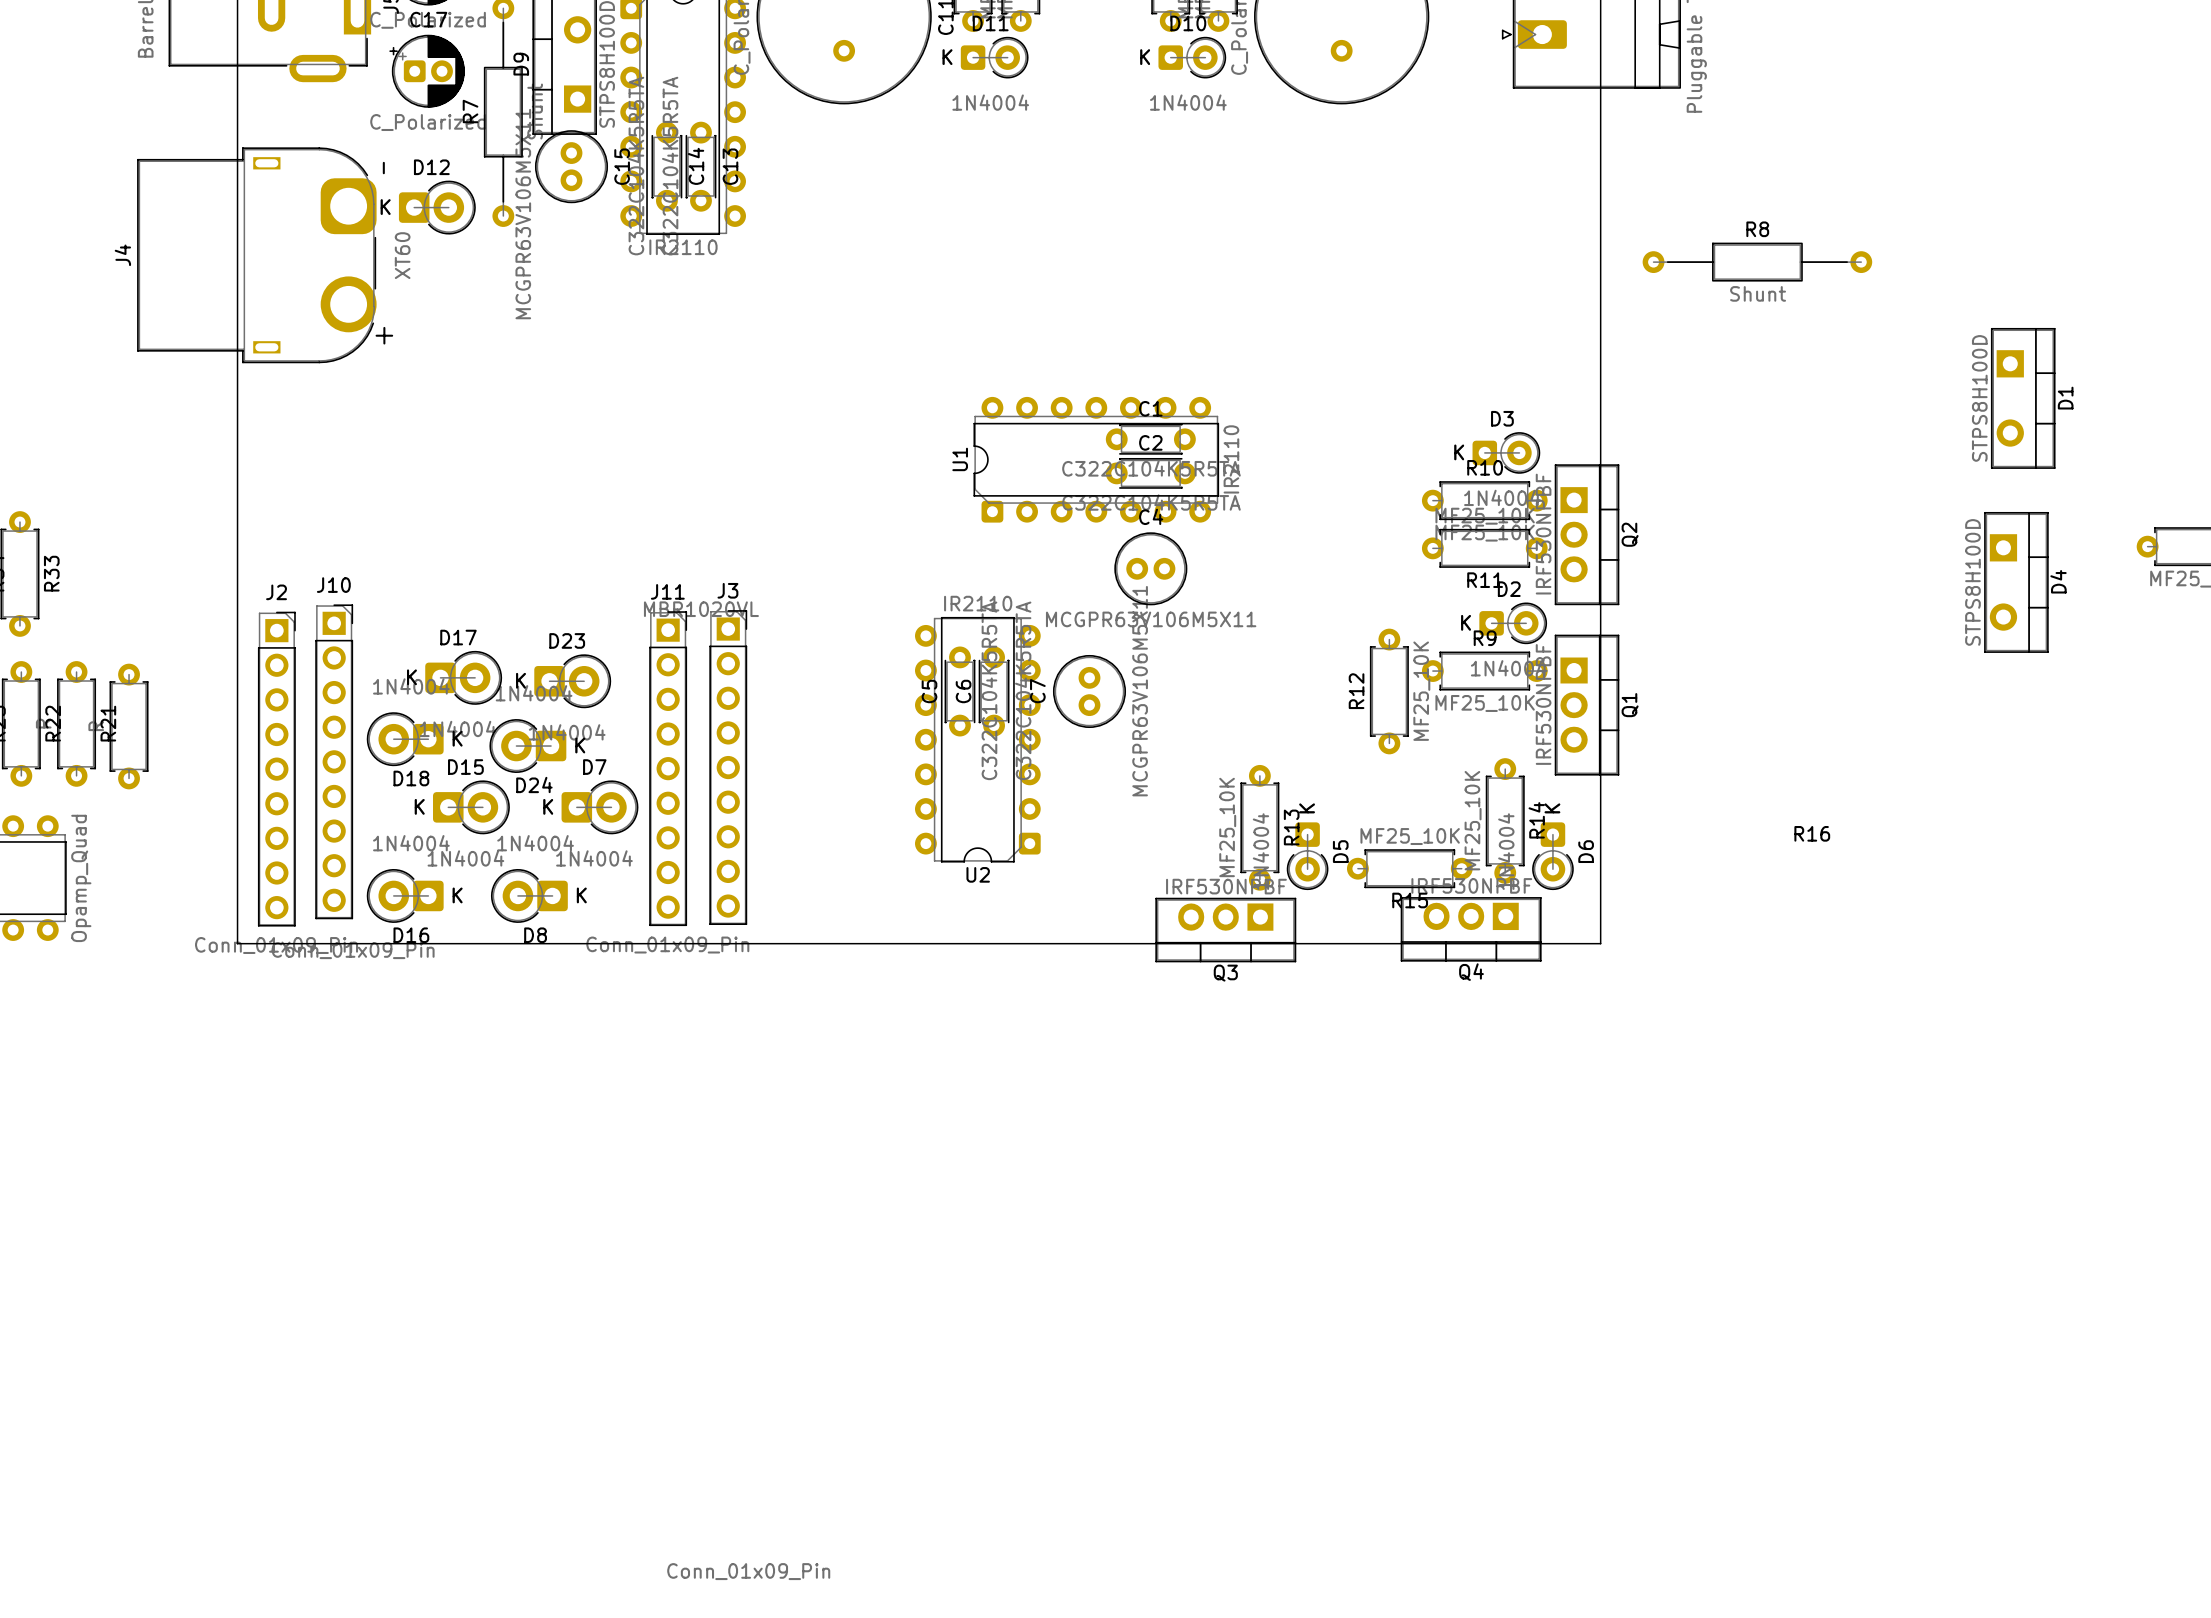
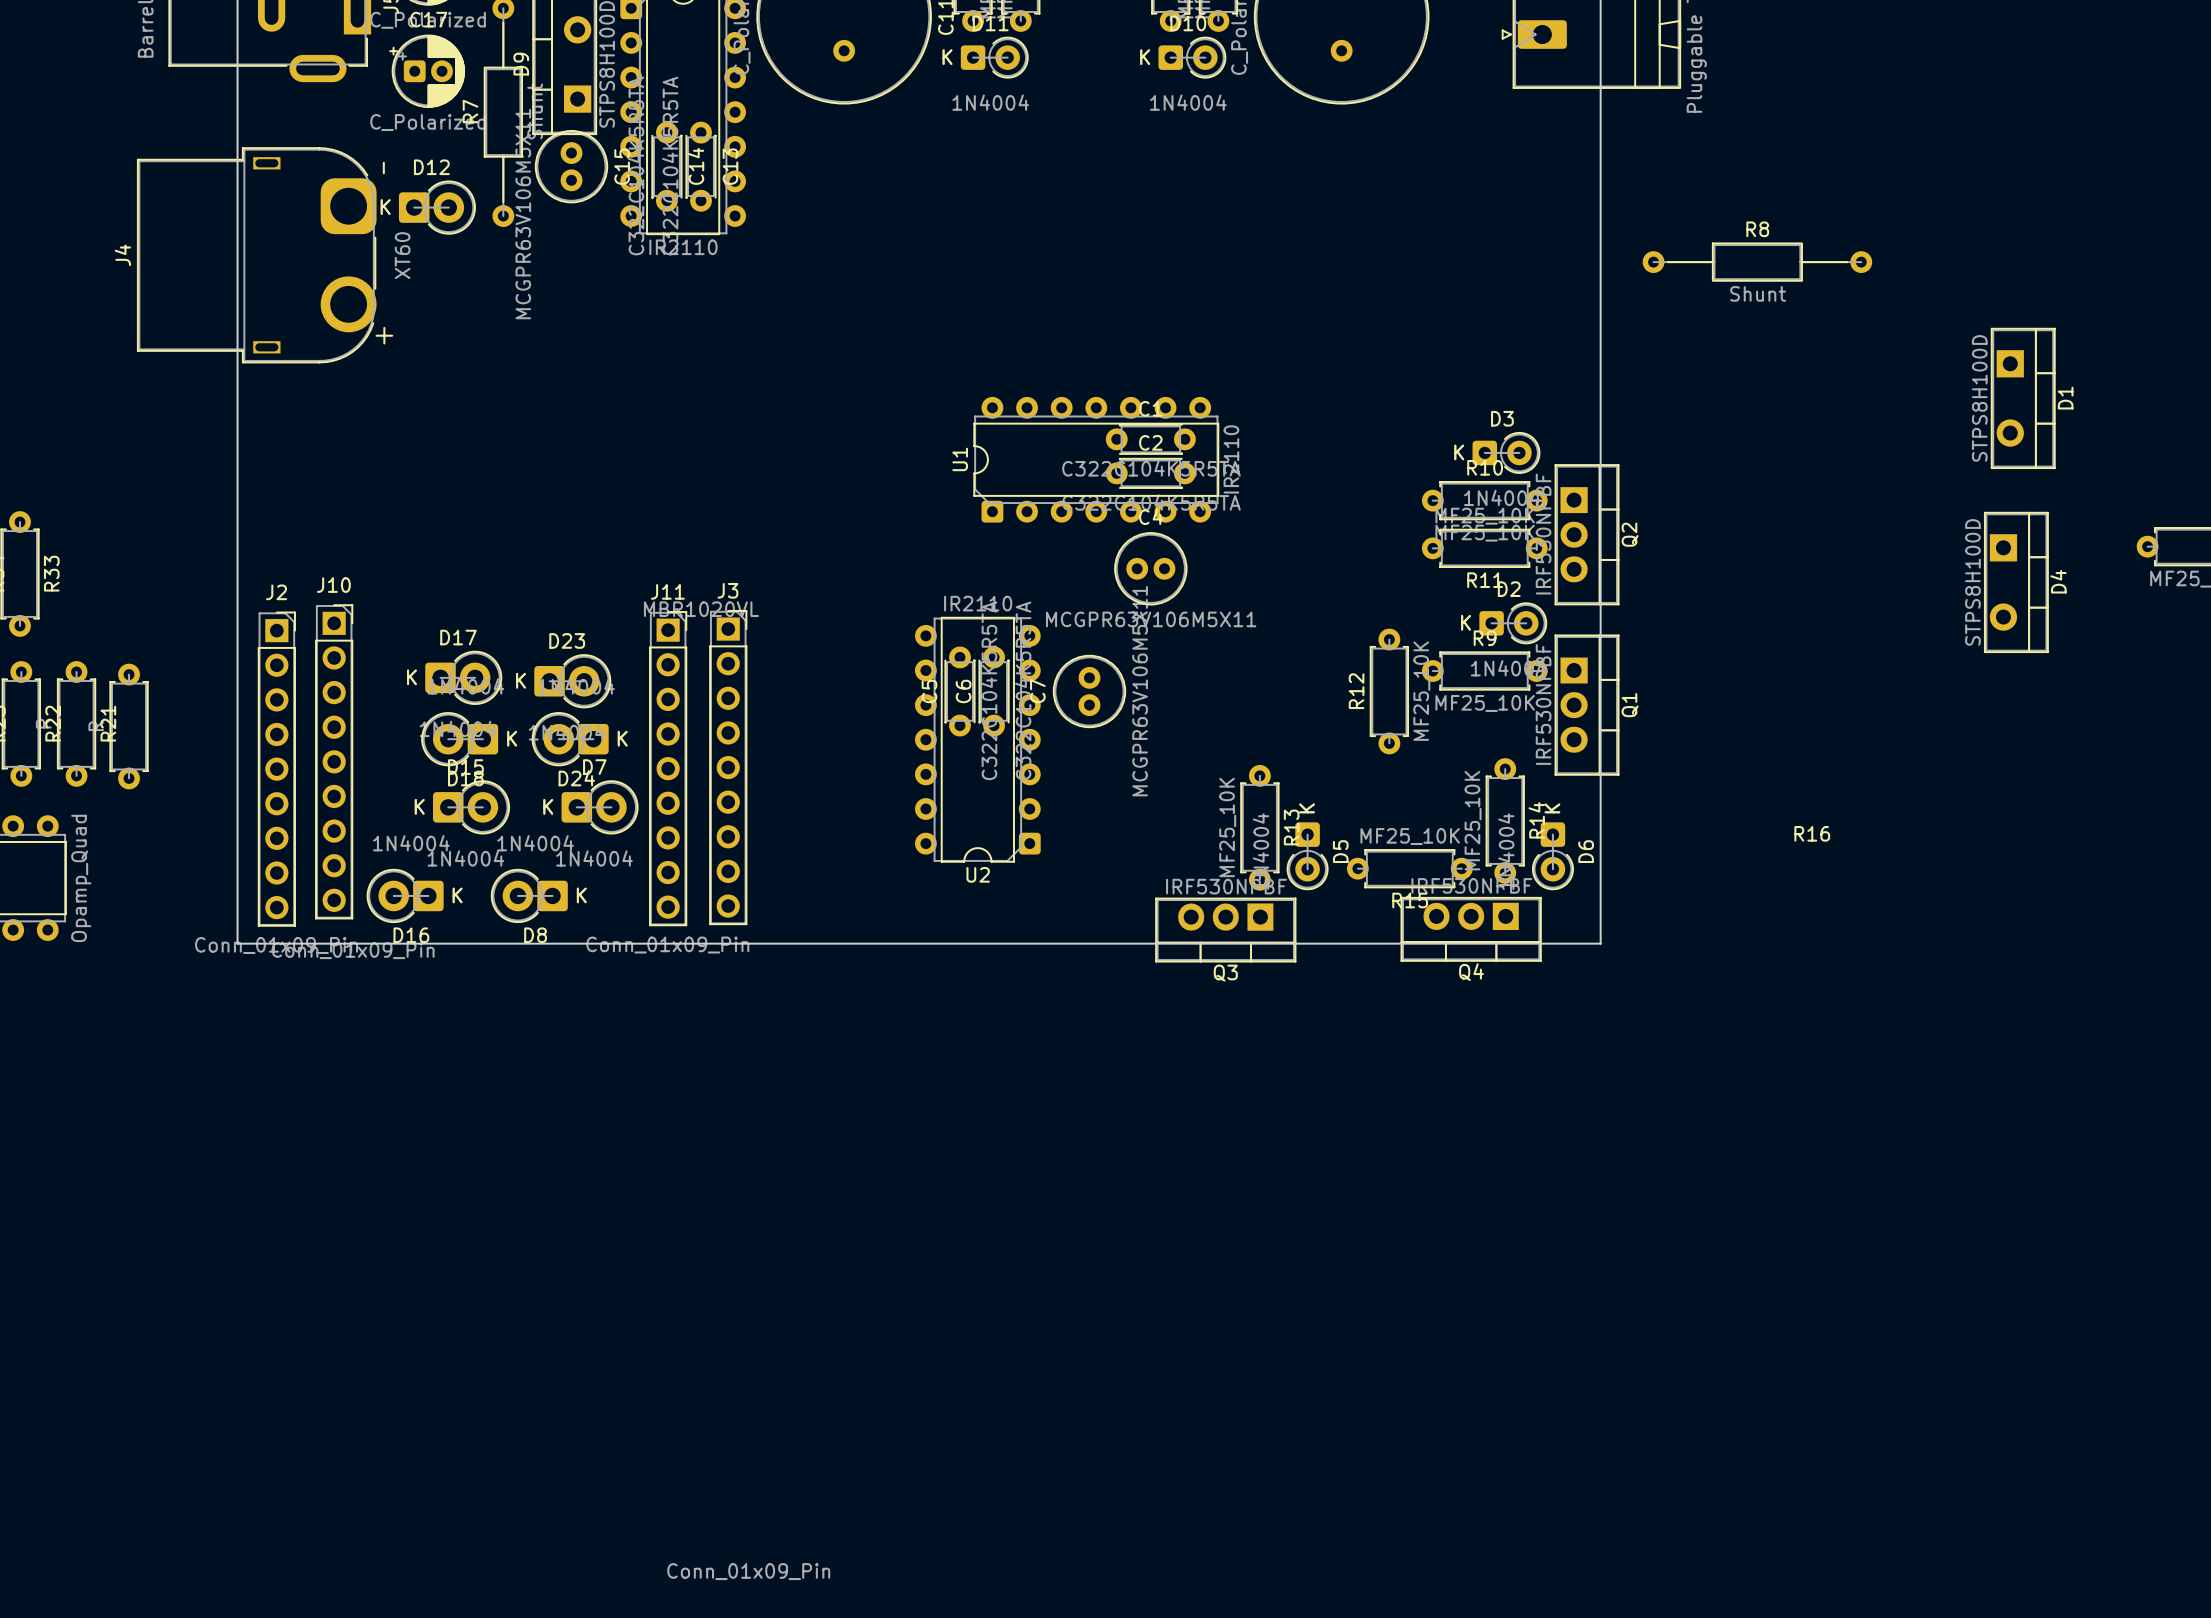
D18 position: (405, 739) -> (459, 739)
D24 position: (527, 746) -> (570, 739)

